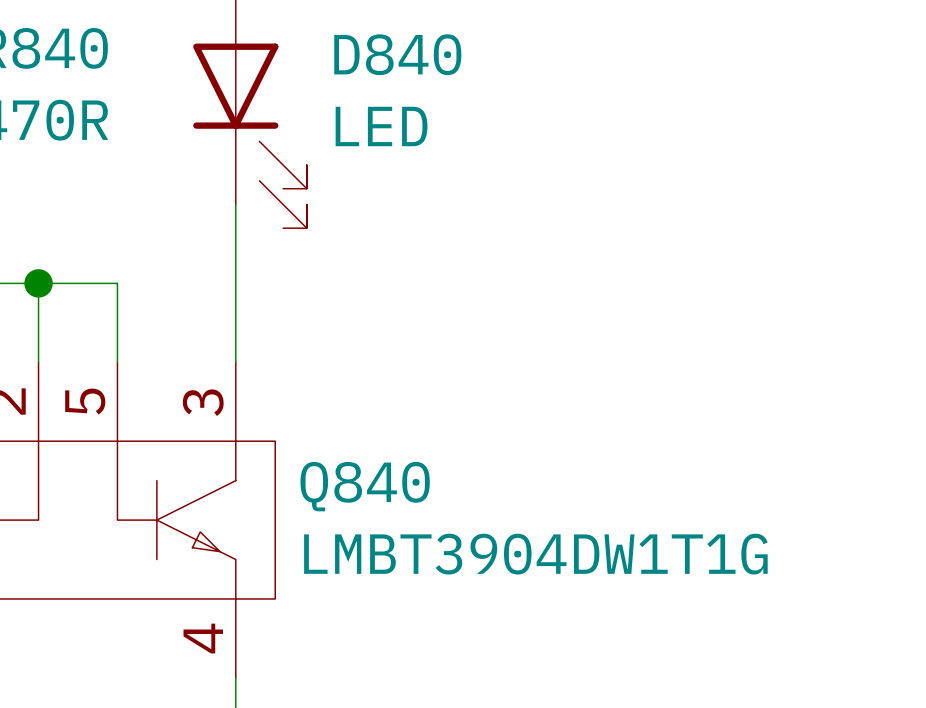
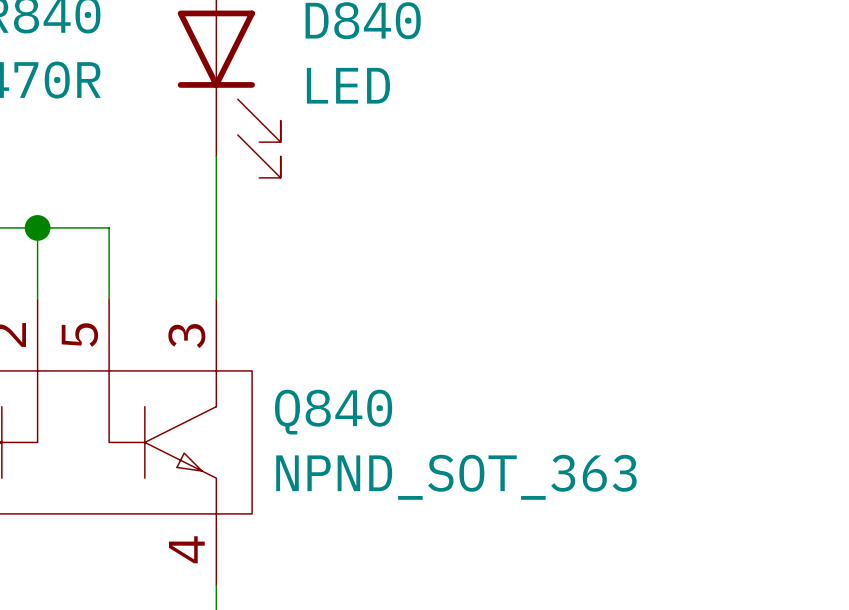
Q840 value: LMBT3904DW1T1G (535, 554) -> NPND_SOT_363 (456, 477)

